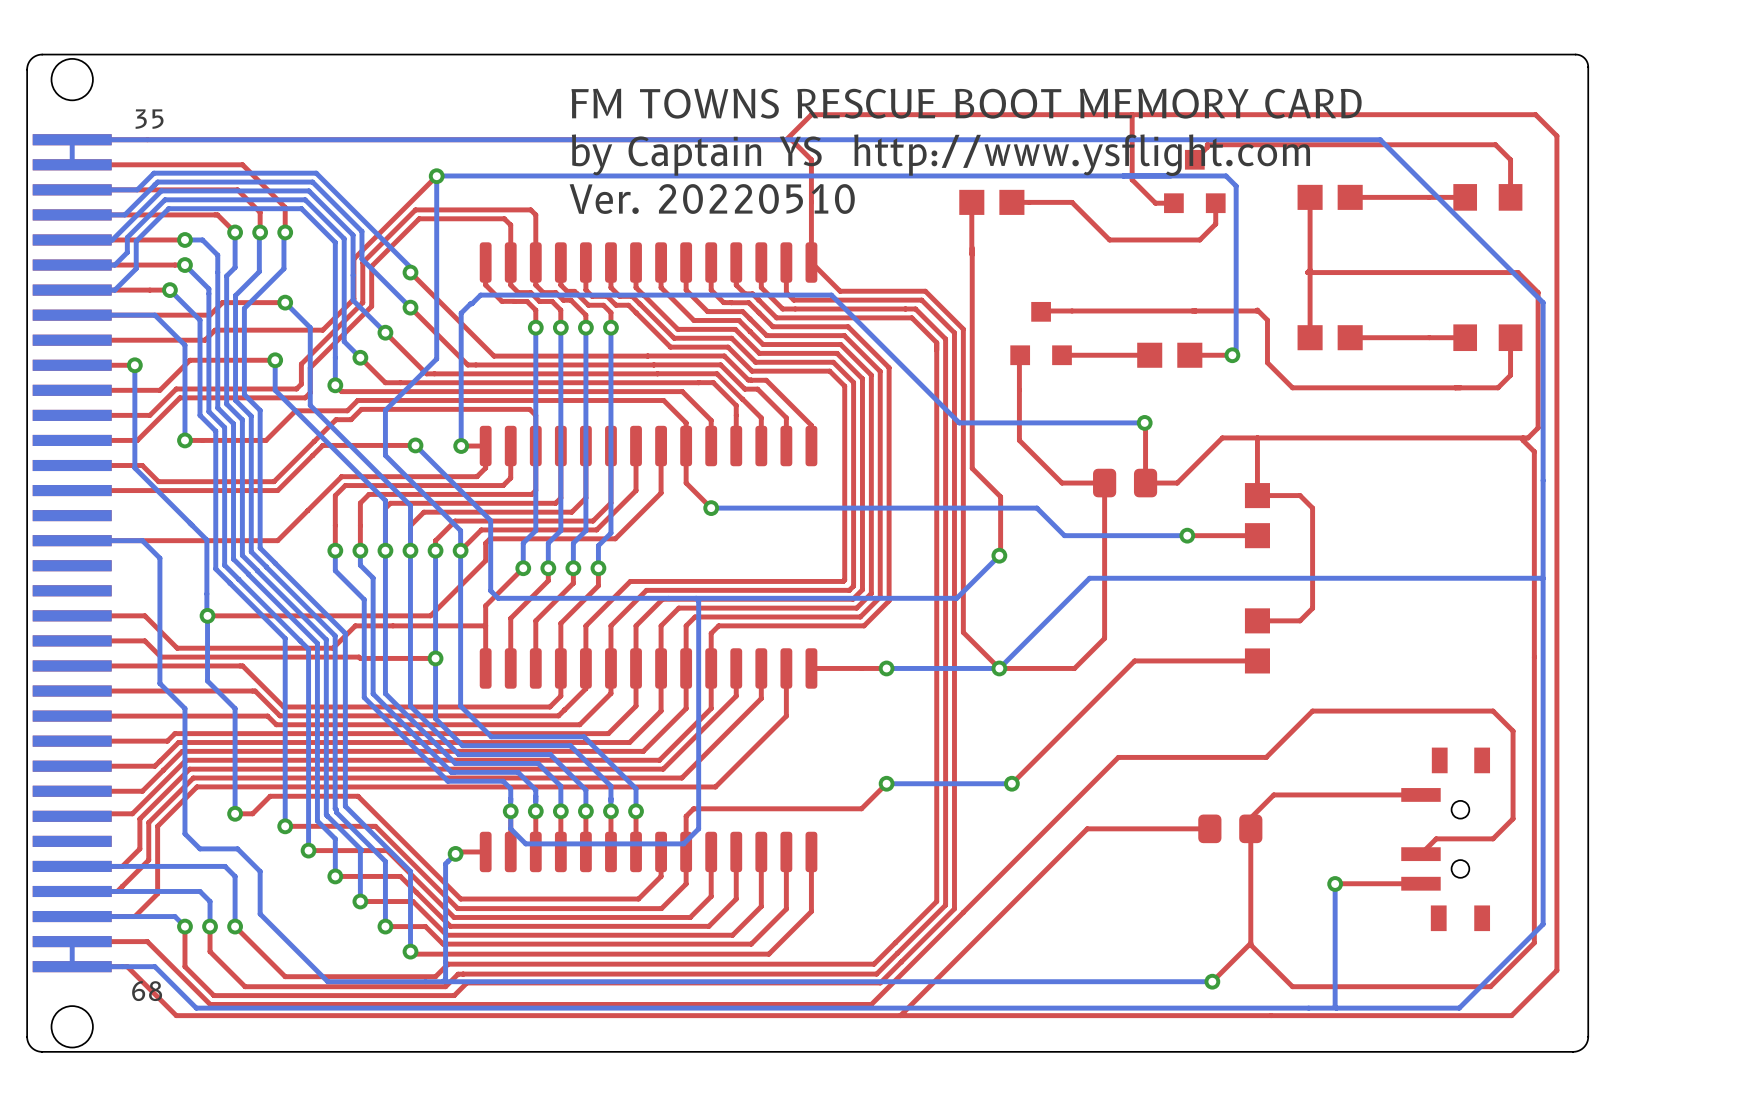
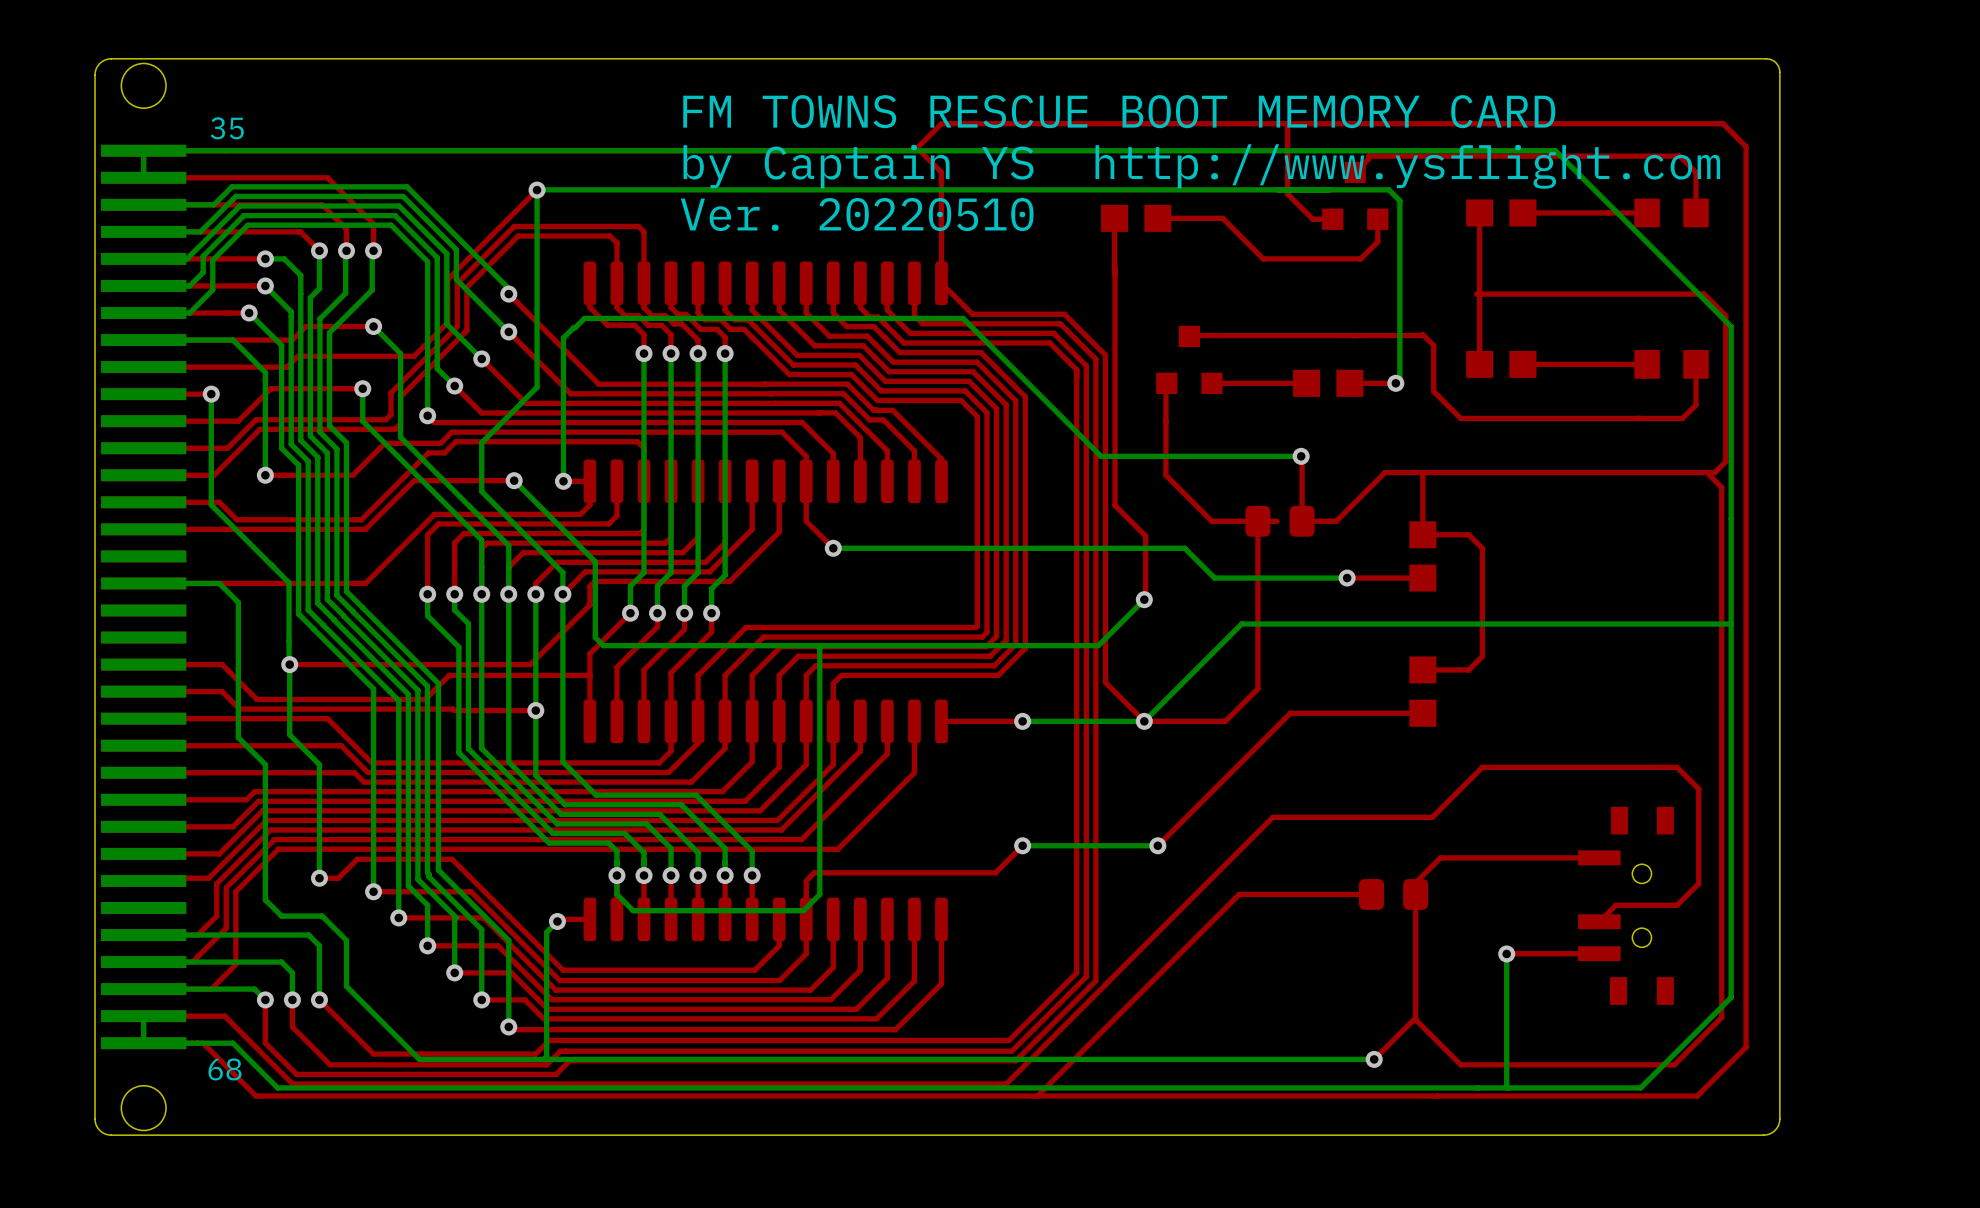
top track: none -> (1277, 521) (1257, 521)

